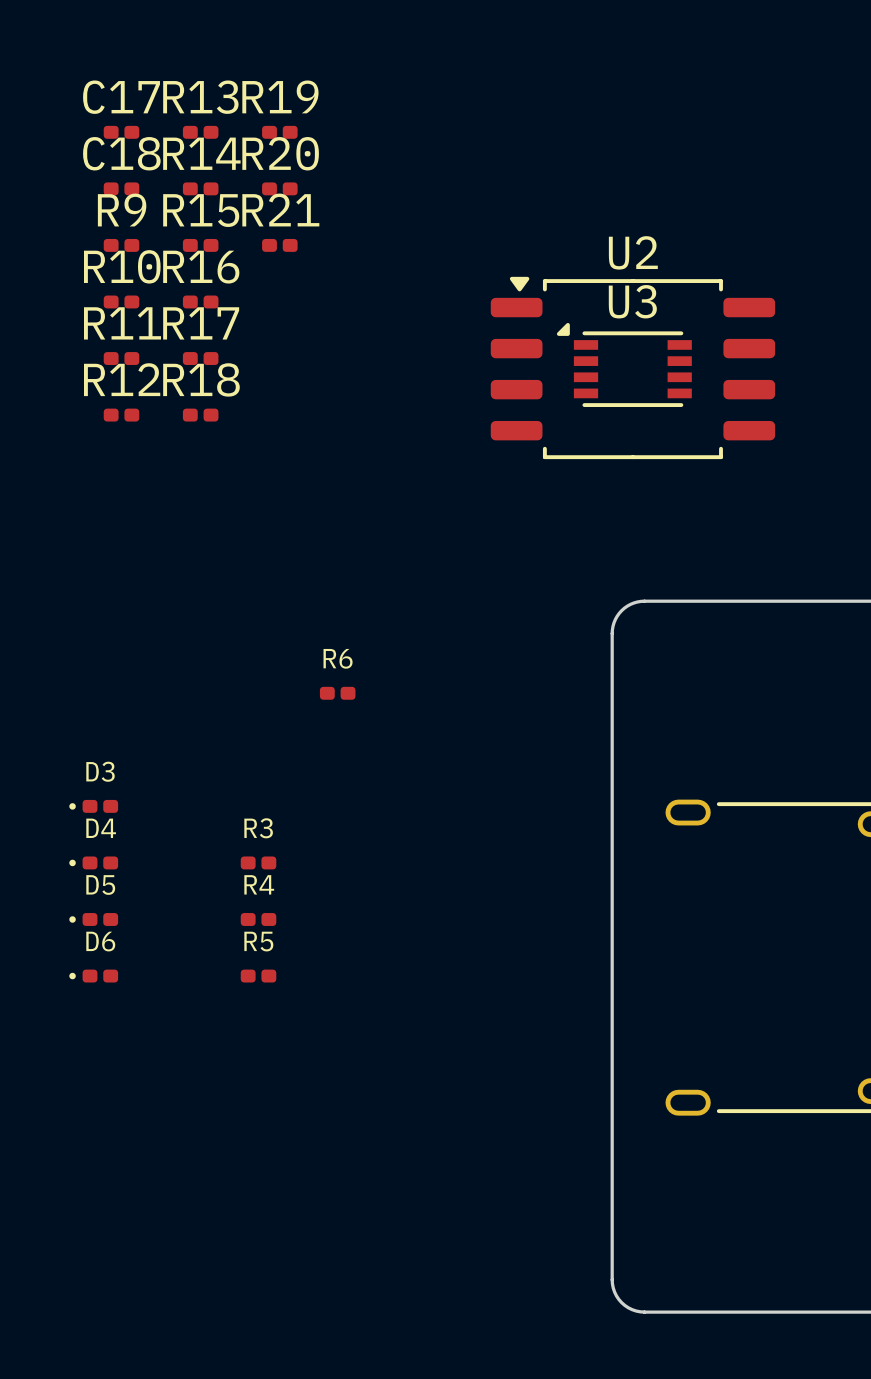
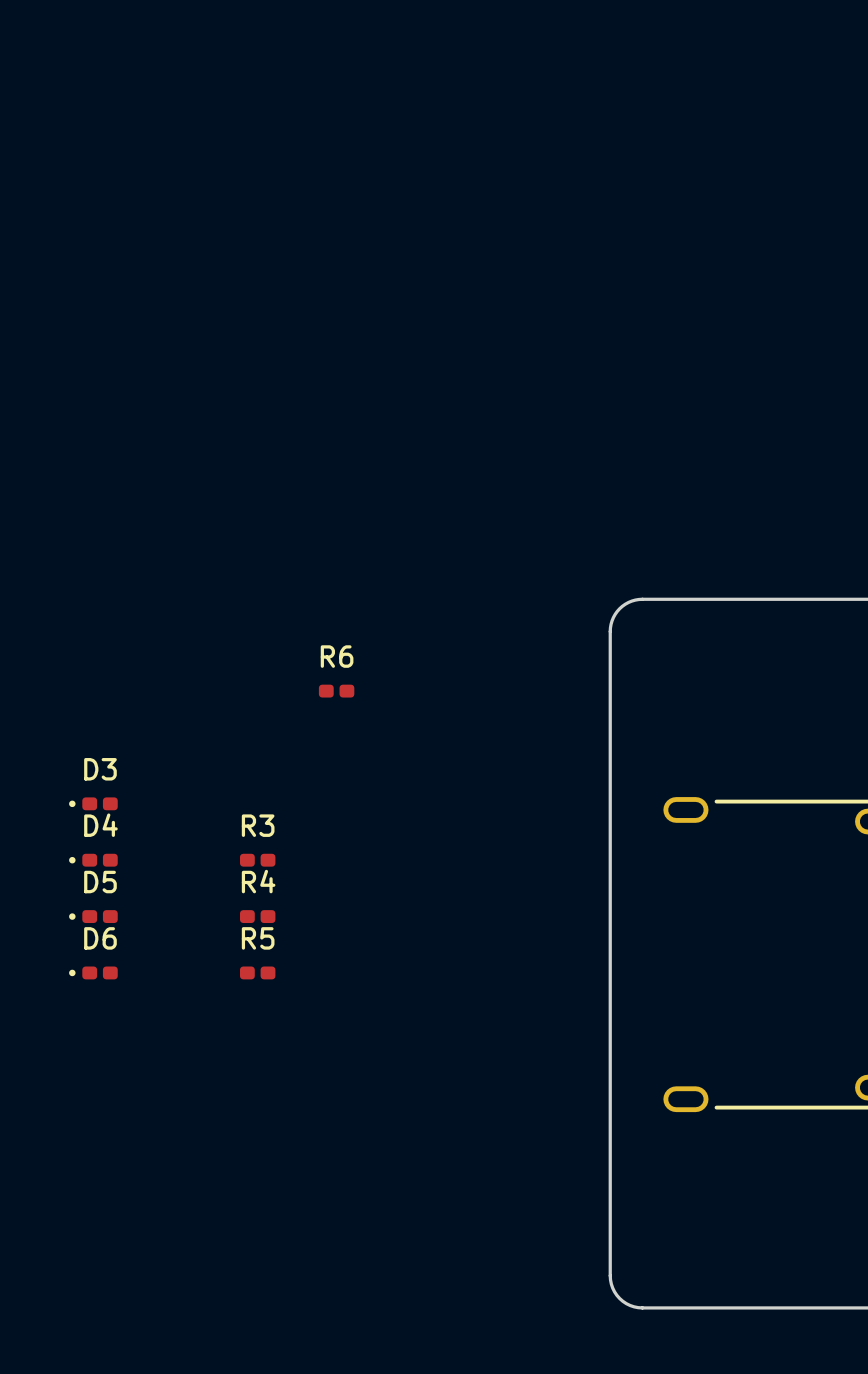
C17: (121, 132) -> none
R13: (200, 132) -> none
R19: (279, 132) -> none
C18: (121, 188) -> none
R14: (200, 188) -> none
R20: (279, 188) -> none
R9: (121, 245) -> none
R15: (200, 245) -> none
R21: (279, 245) -> none
R10: (121, 301) -> none
R16: (200, 301) -> none
R11: (121, 358) -> none
R17: (200, 358) -> none
U3: (624, 364) -> none
U2: (632, 367) -> none
R12: (121, 415) -> none
R18: (200, 415) -> none

